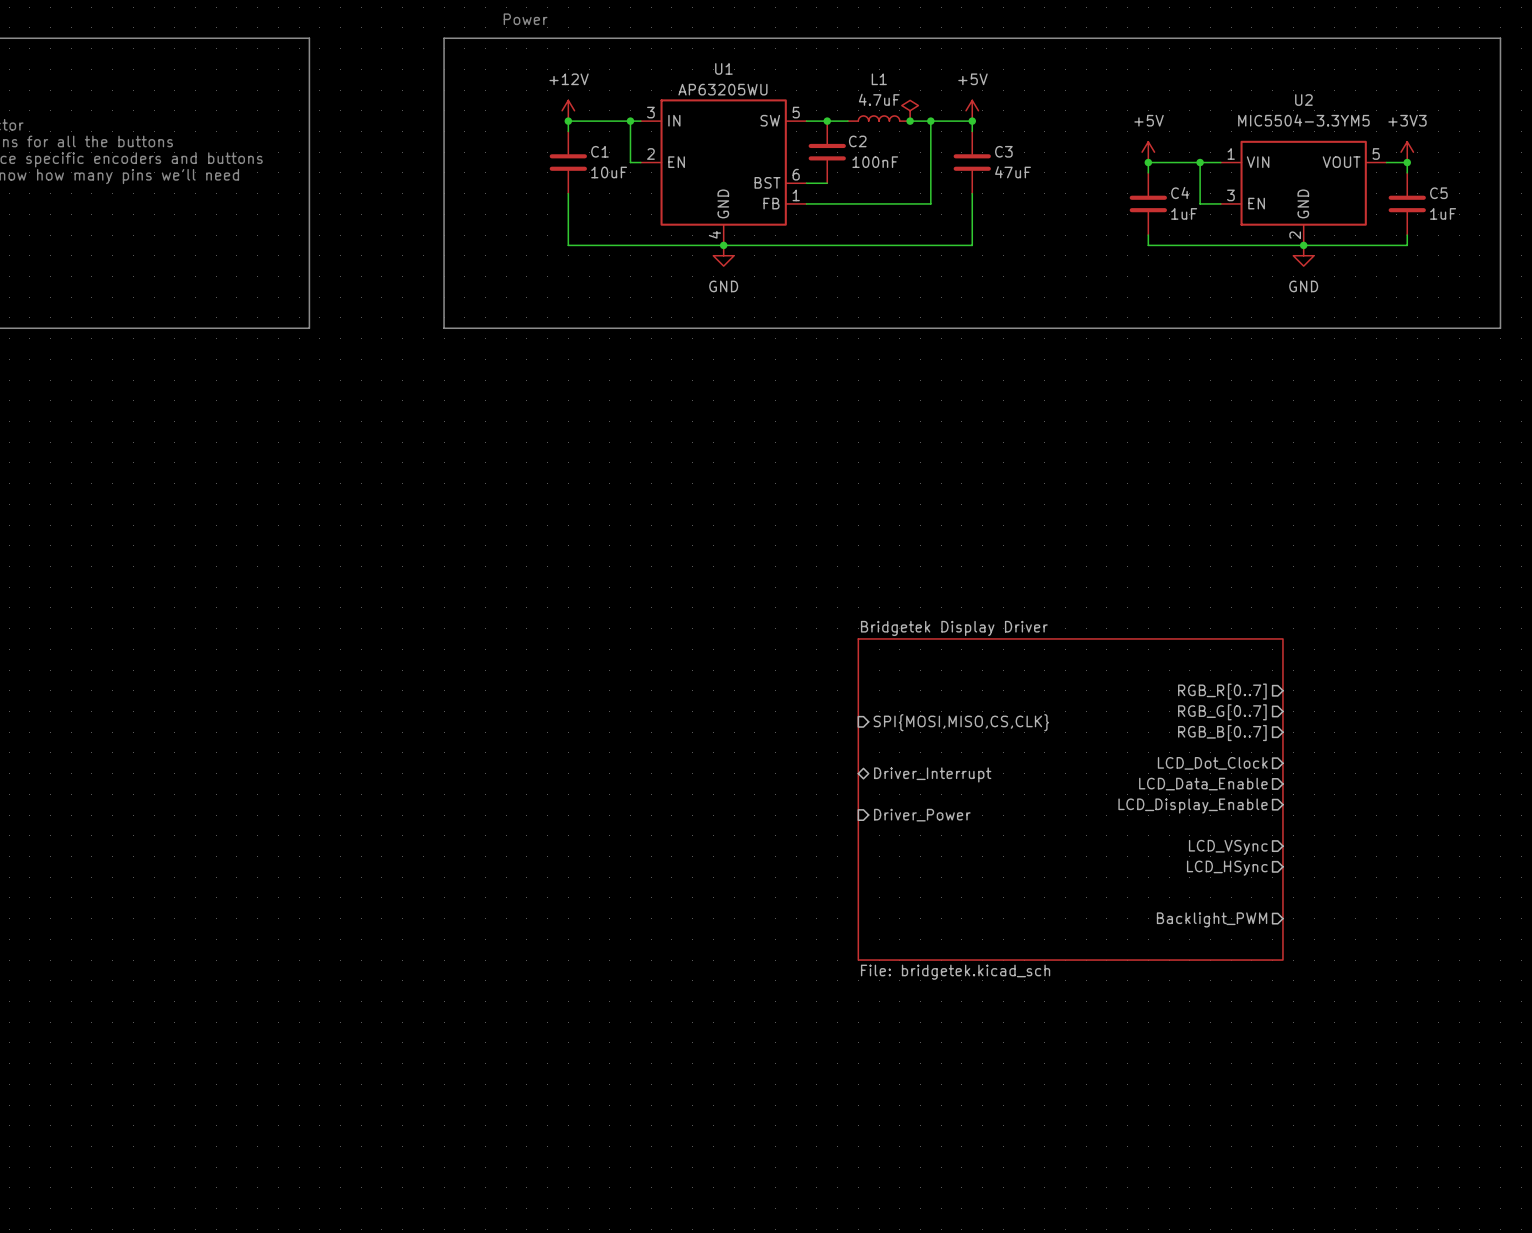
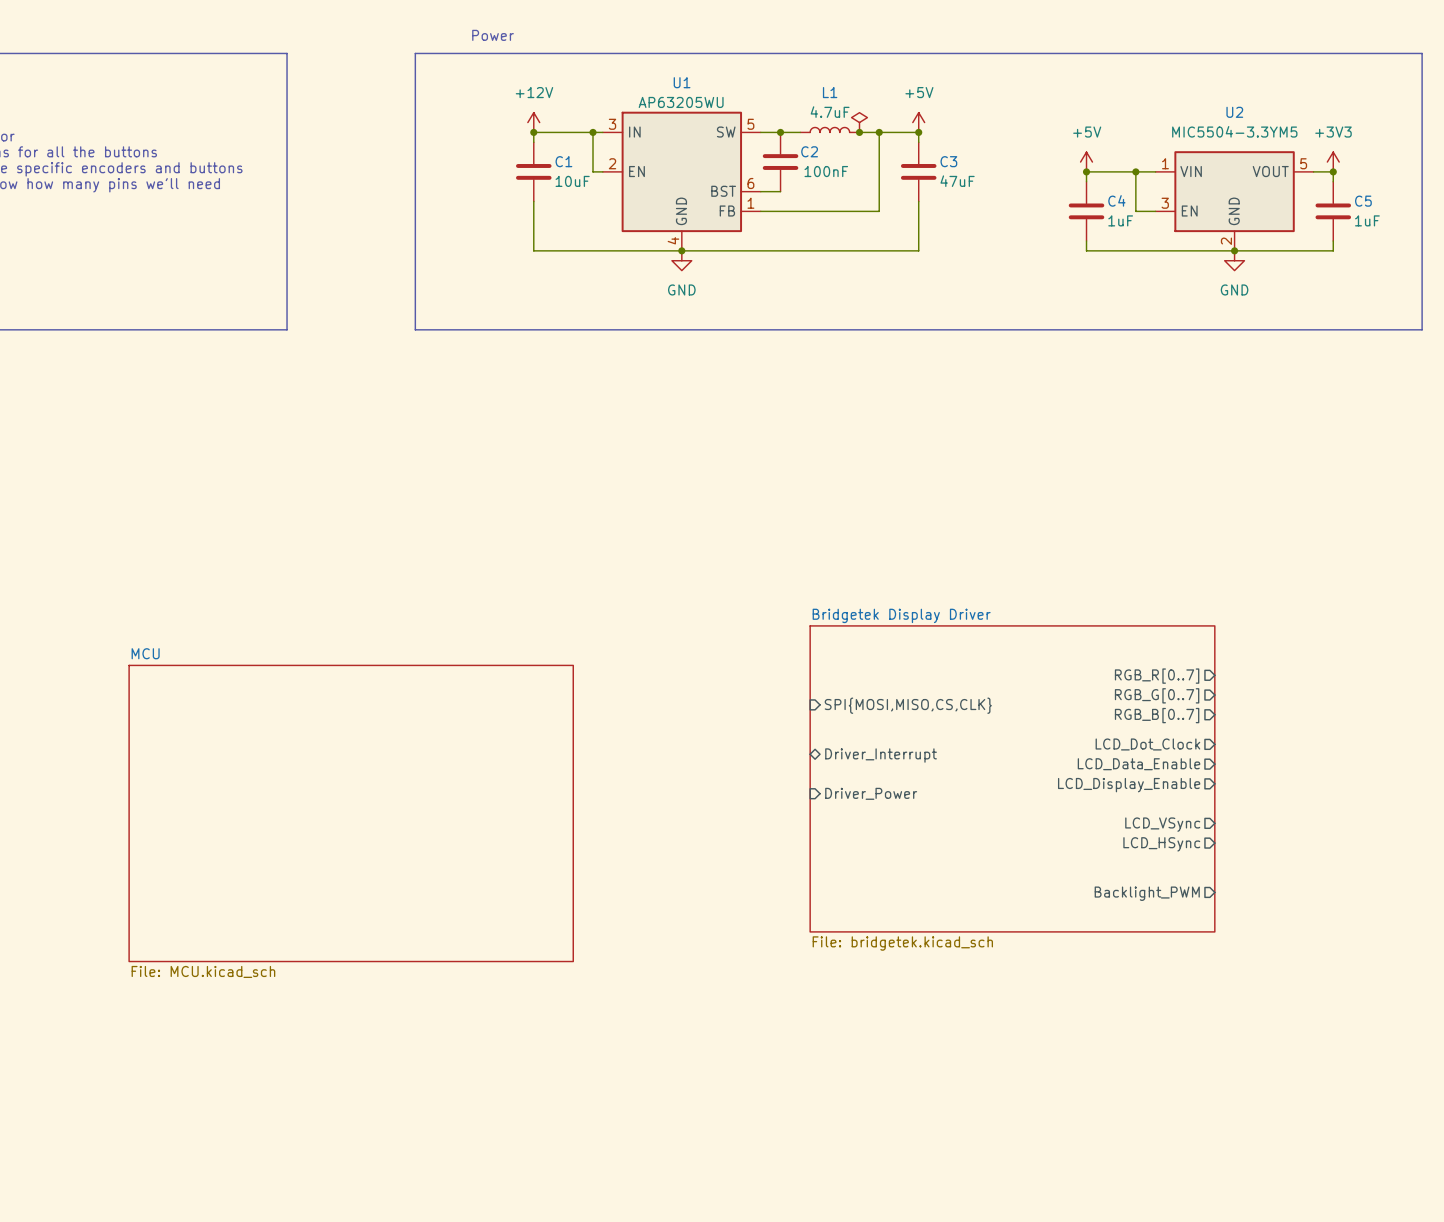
sheet MCU: none -> File: MCU.kicad_sch (351, 813)

